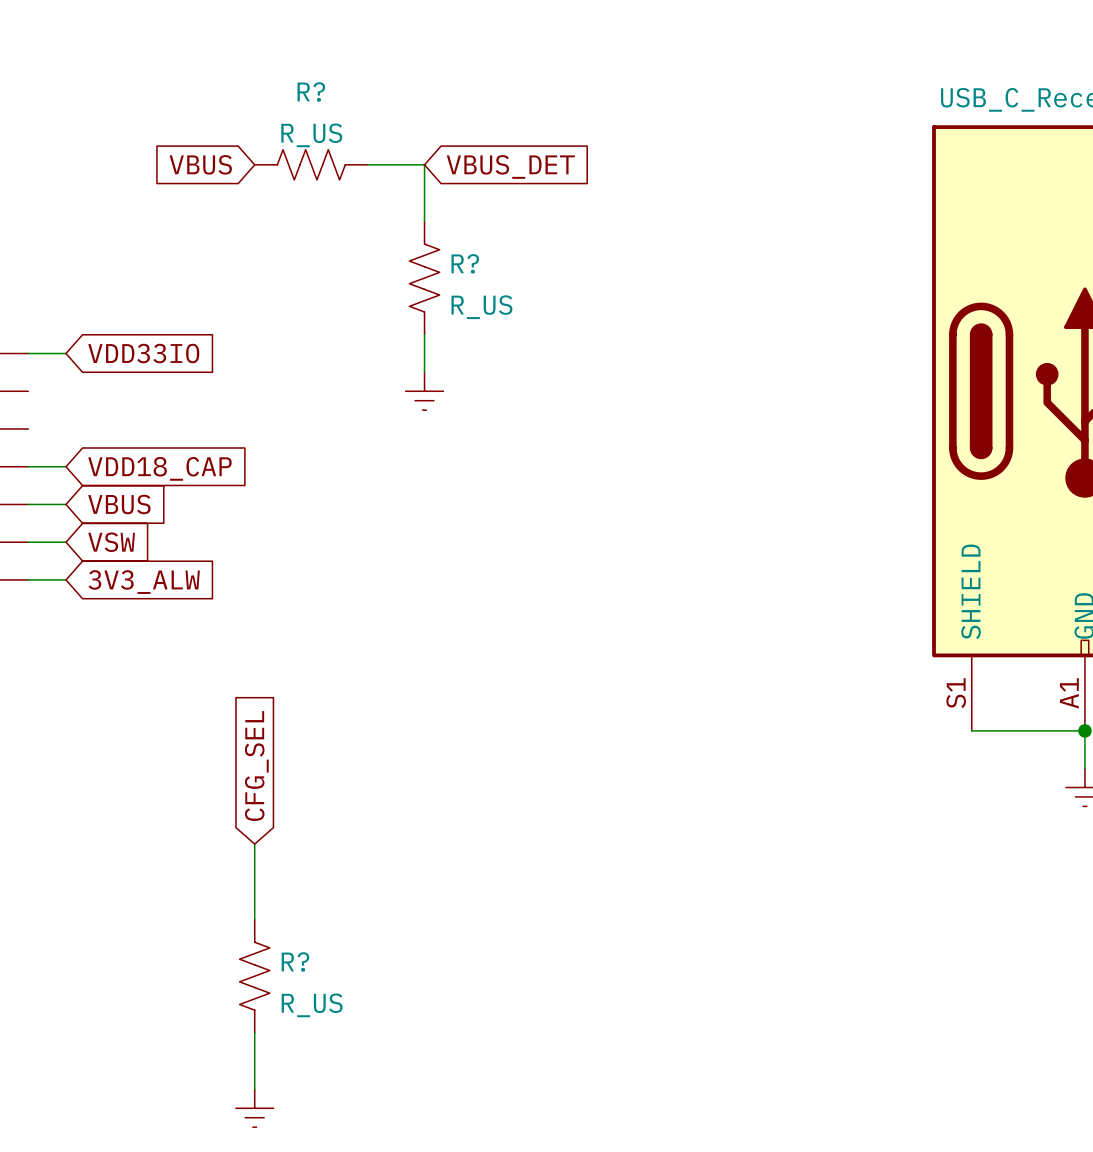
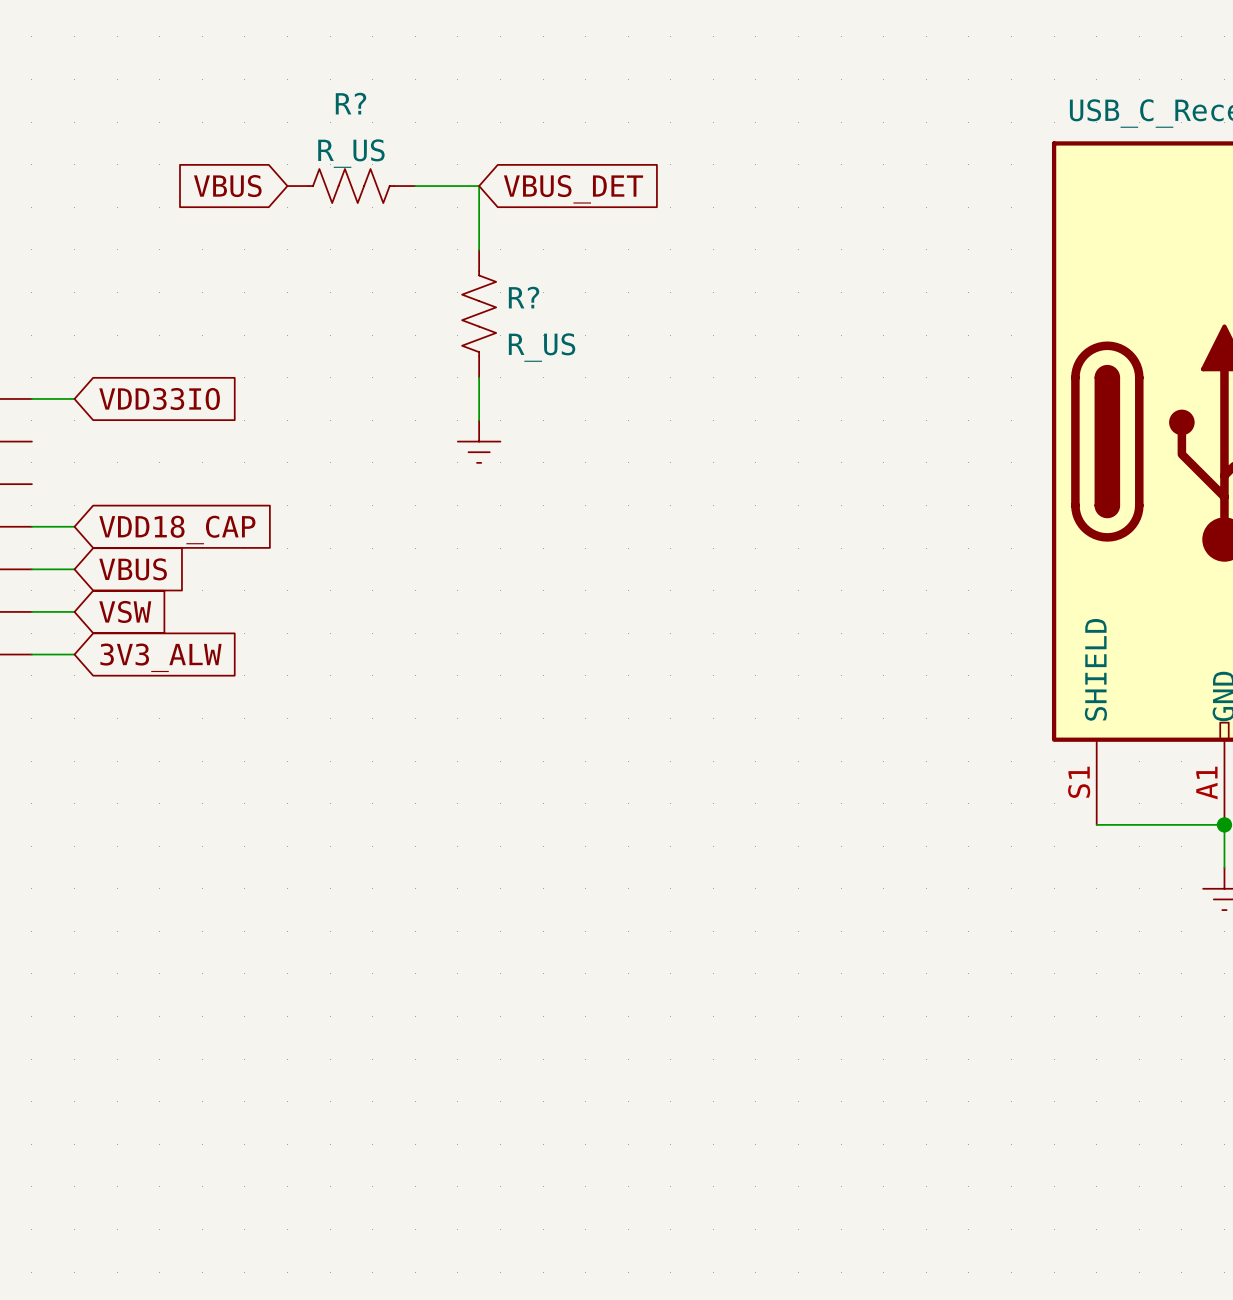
global label: CFG_SEL (256, 766) -> none
wire: (254, 844) (254, 919) -> none
R?: R_US (254, 976) -> none
wire: (254, 1032) (254, 1089) -> none
power symbol: (254, 1108) -> none

